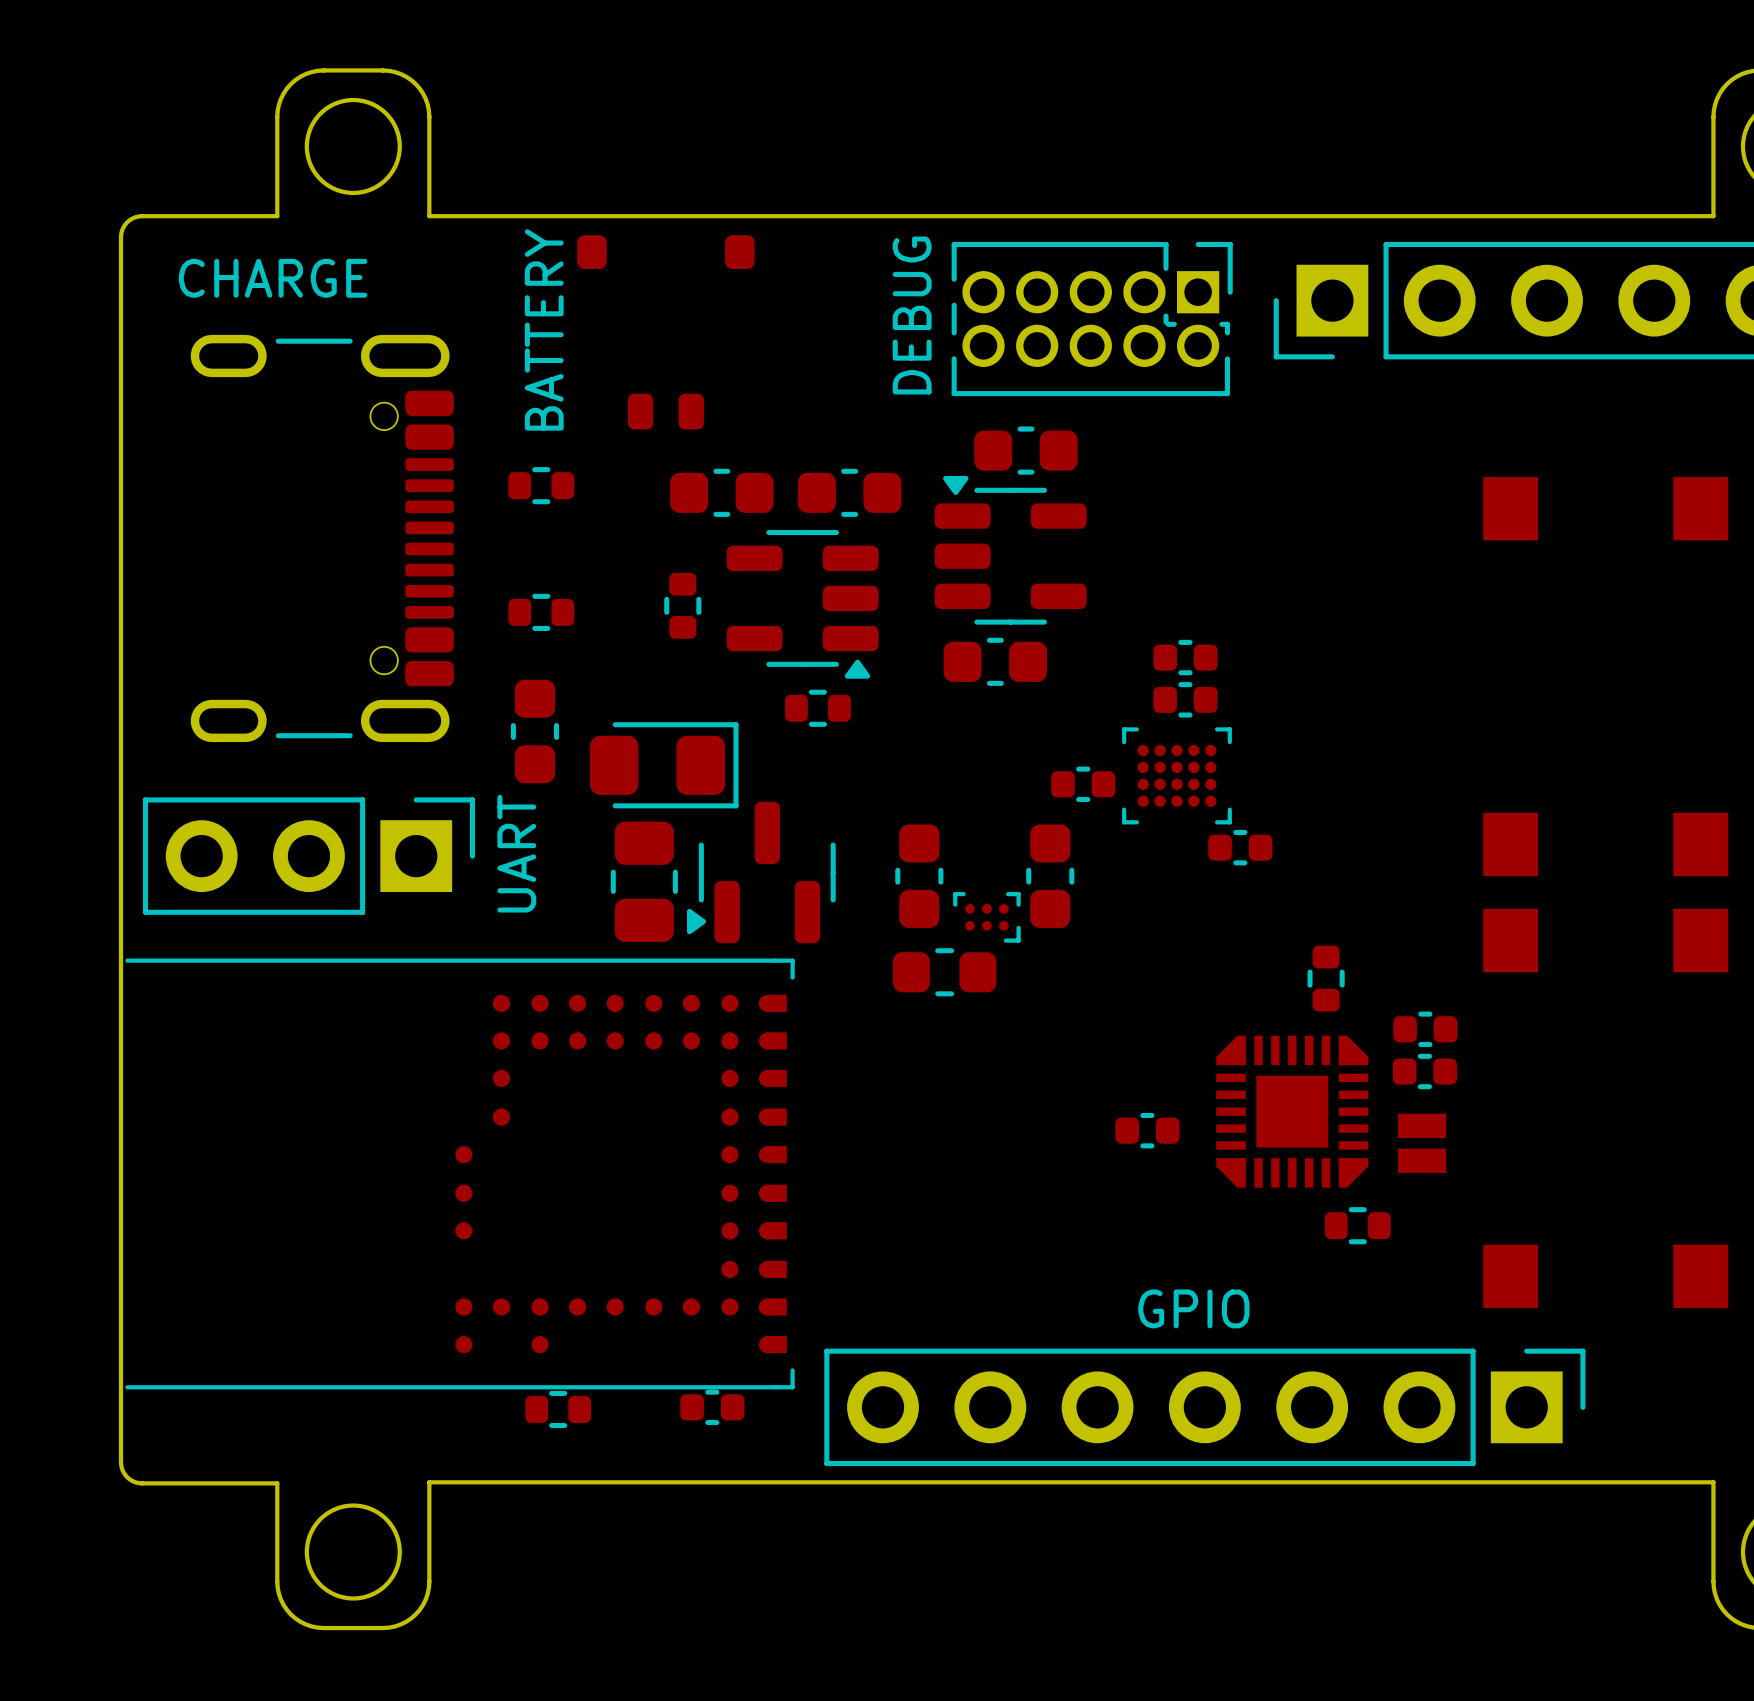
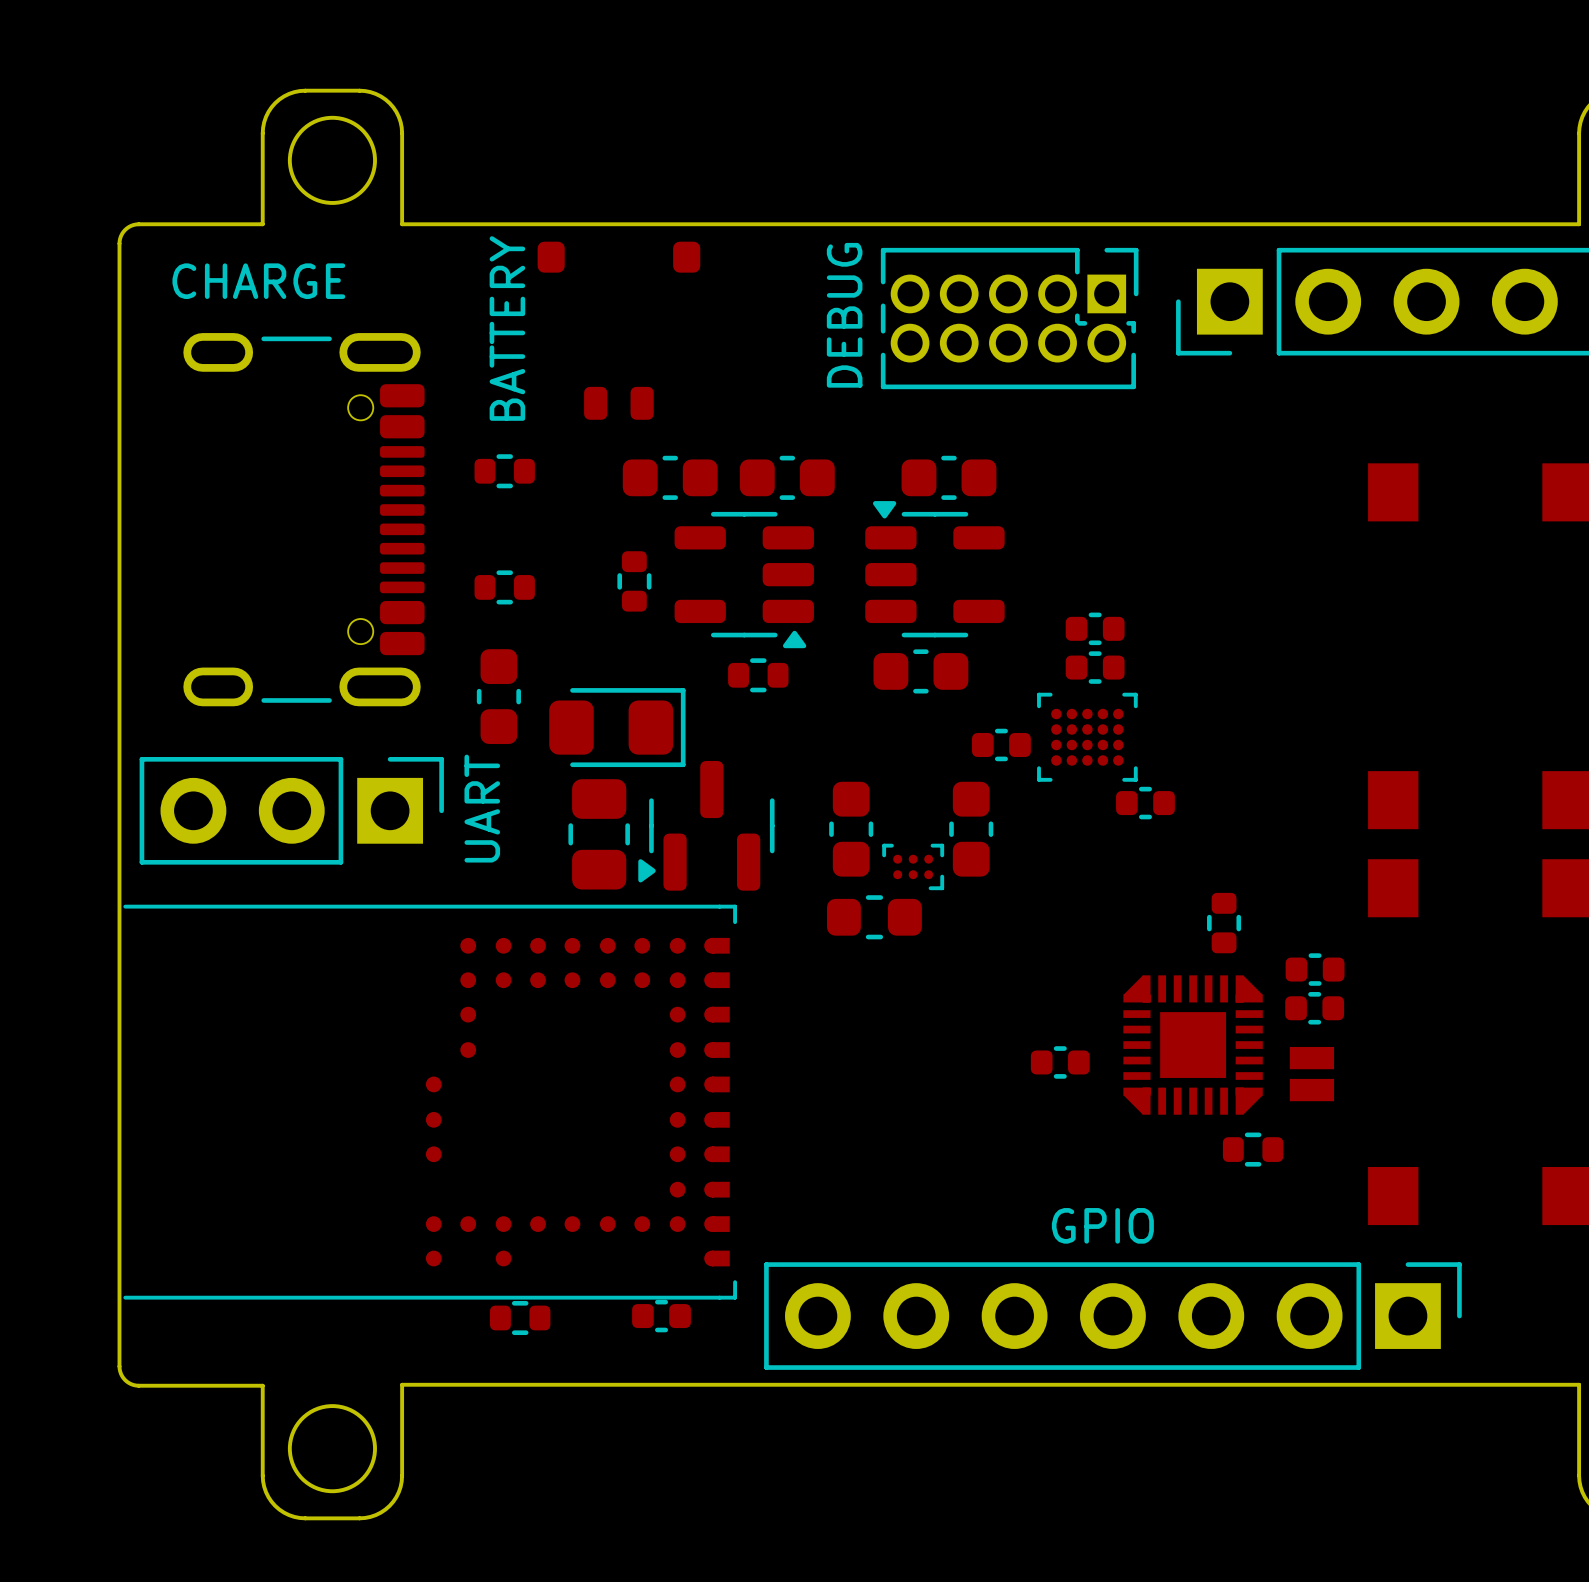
part position: (1025, 450) -> (948, 477)
part position: (1010, 550) -> (934, 569)
part position: (995, 661) -> (920, 671)

